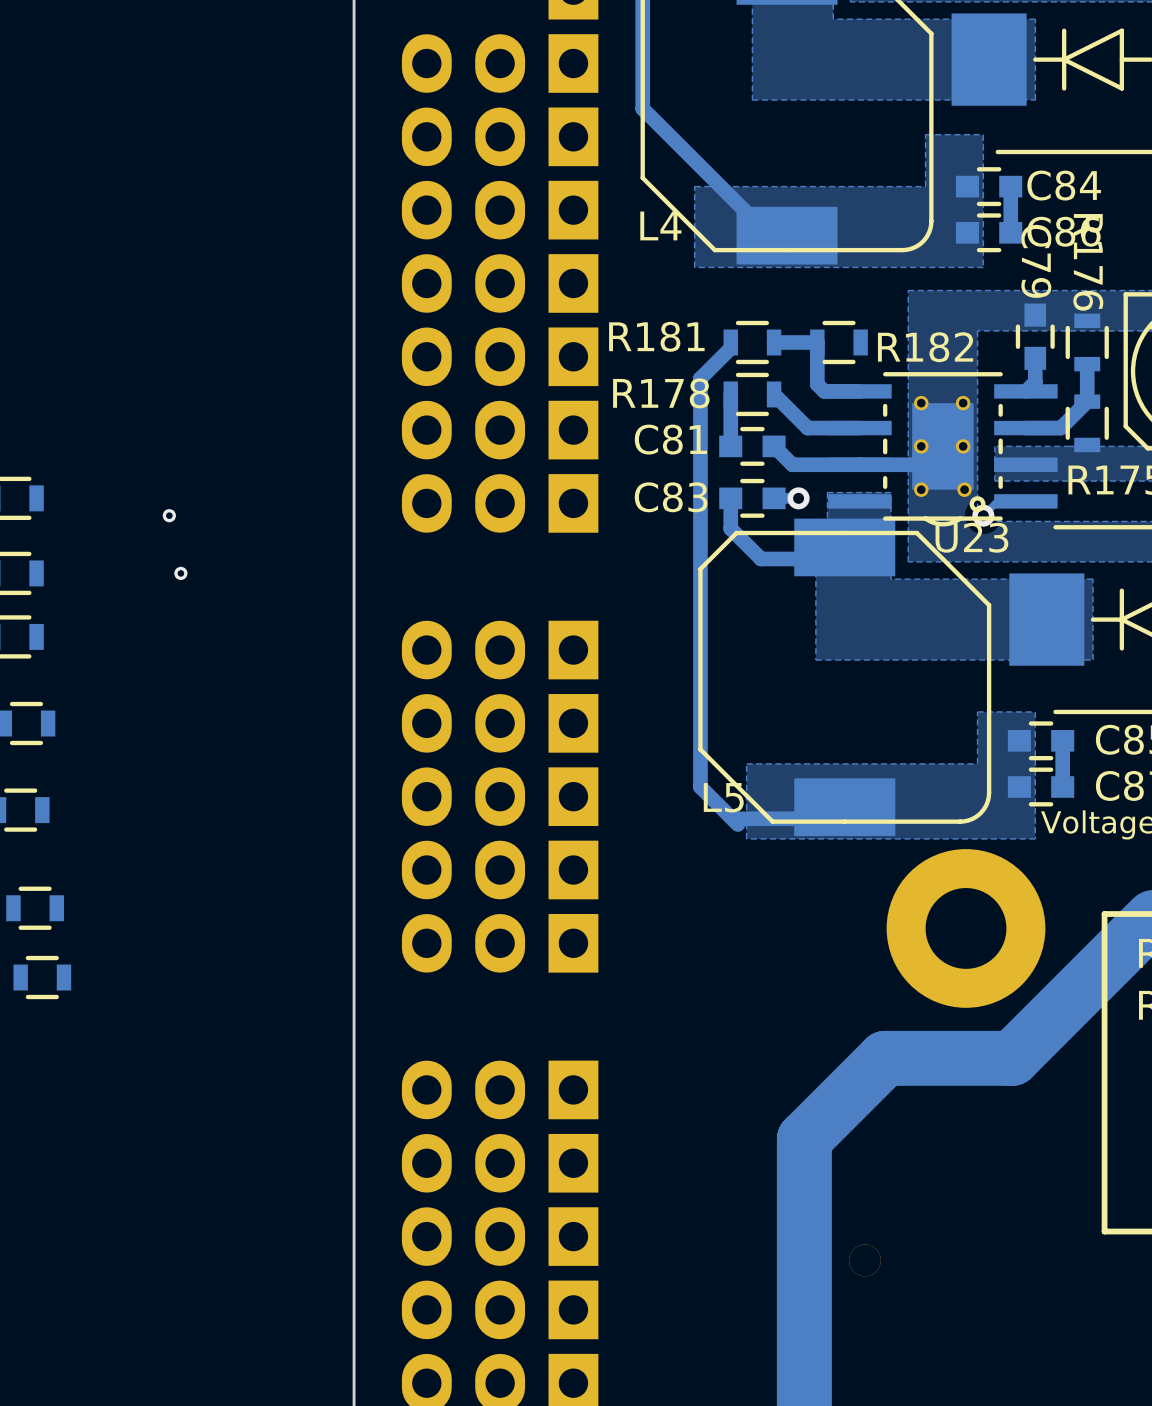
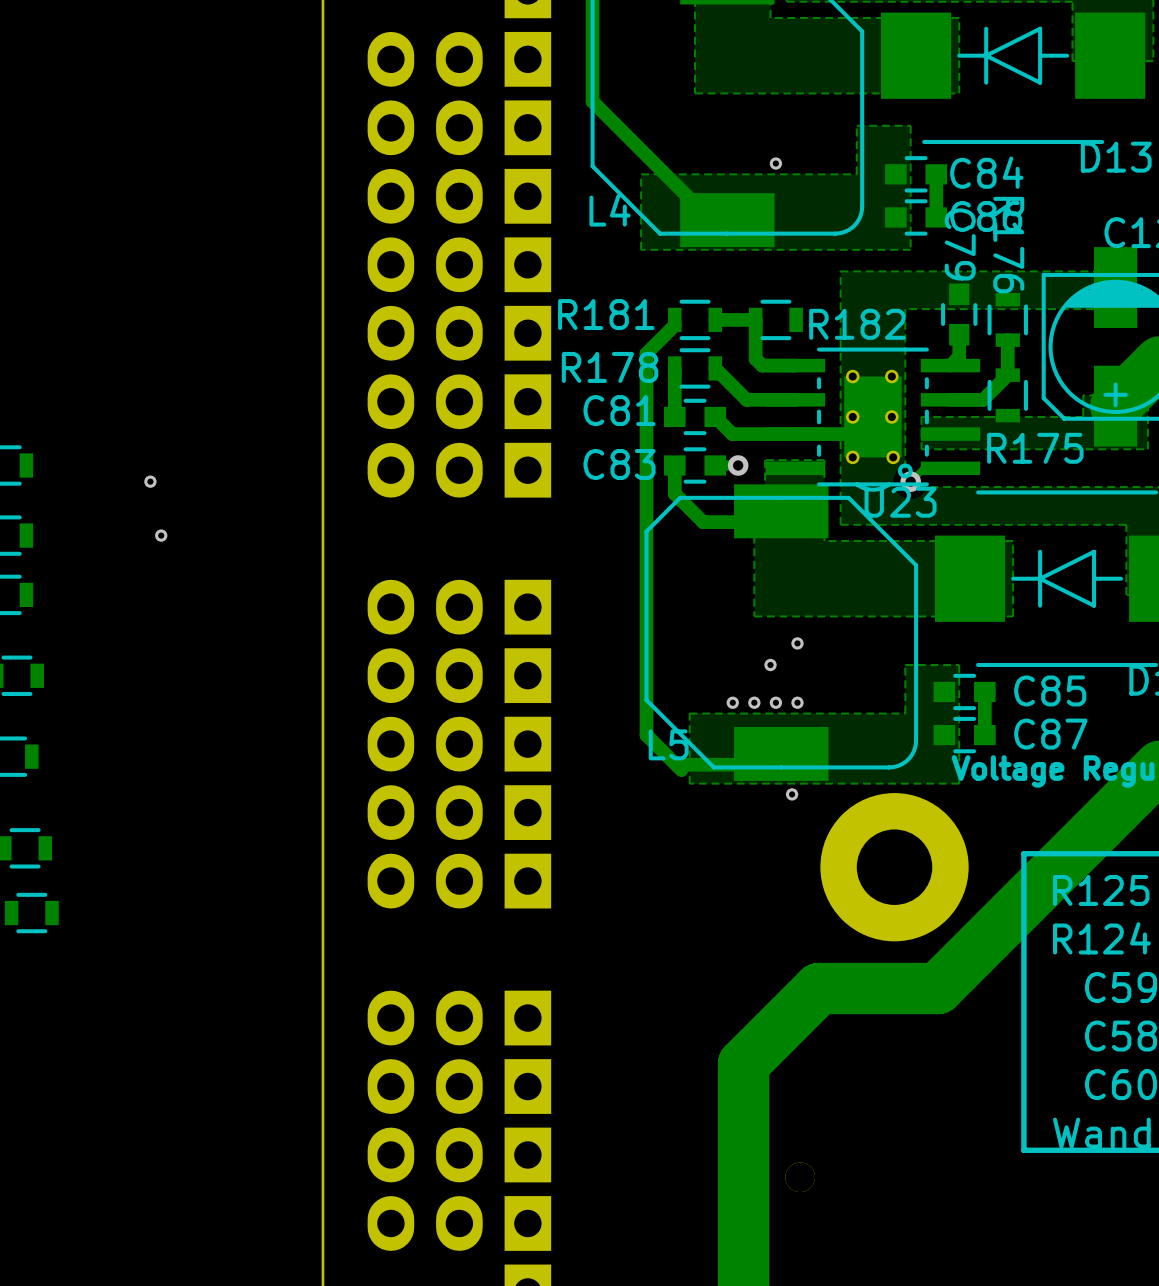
via: none -> (775, 163)
via: none -> (797, 643)
via: none -> (770, 665)
via: none -> (732, 702)
via: none -> (754, 702)
via: none -> (775, 702)
via: none -> (797, 702)
via: none -> (792, 794)

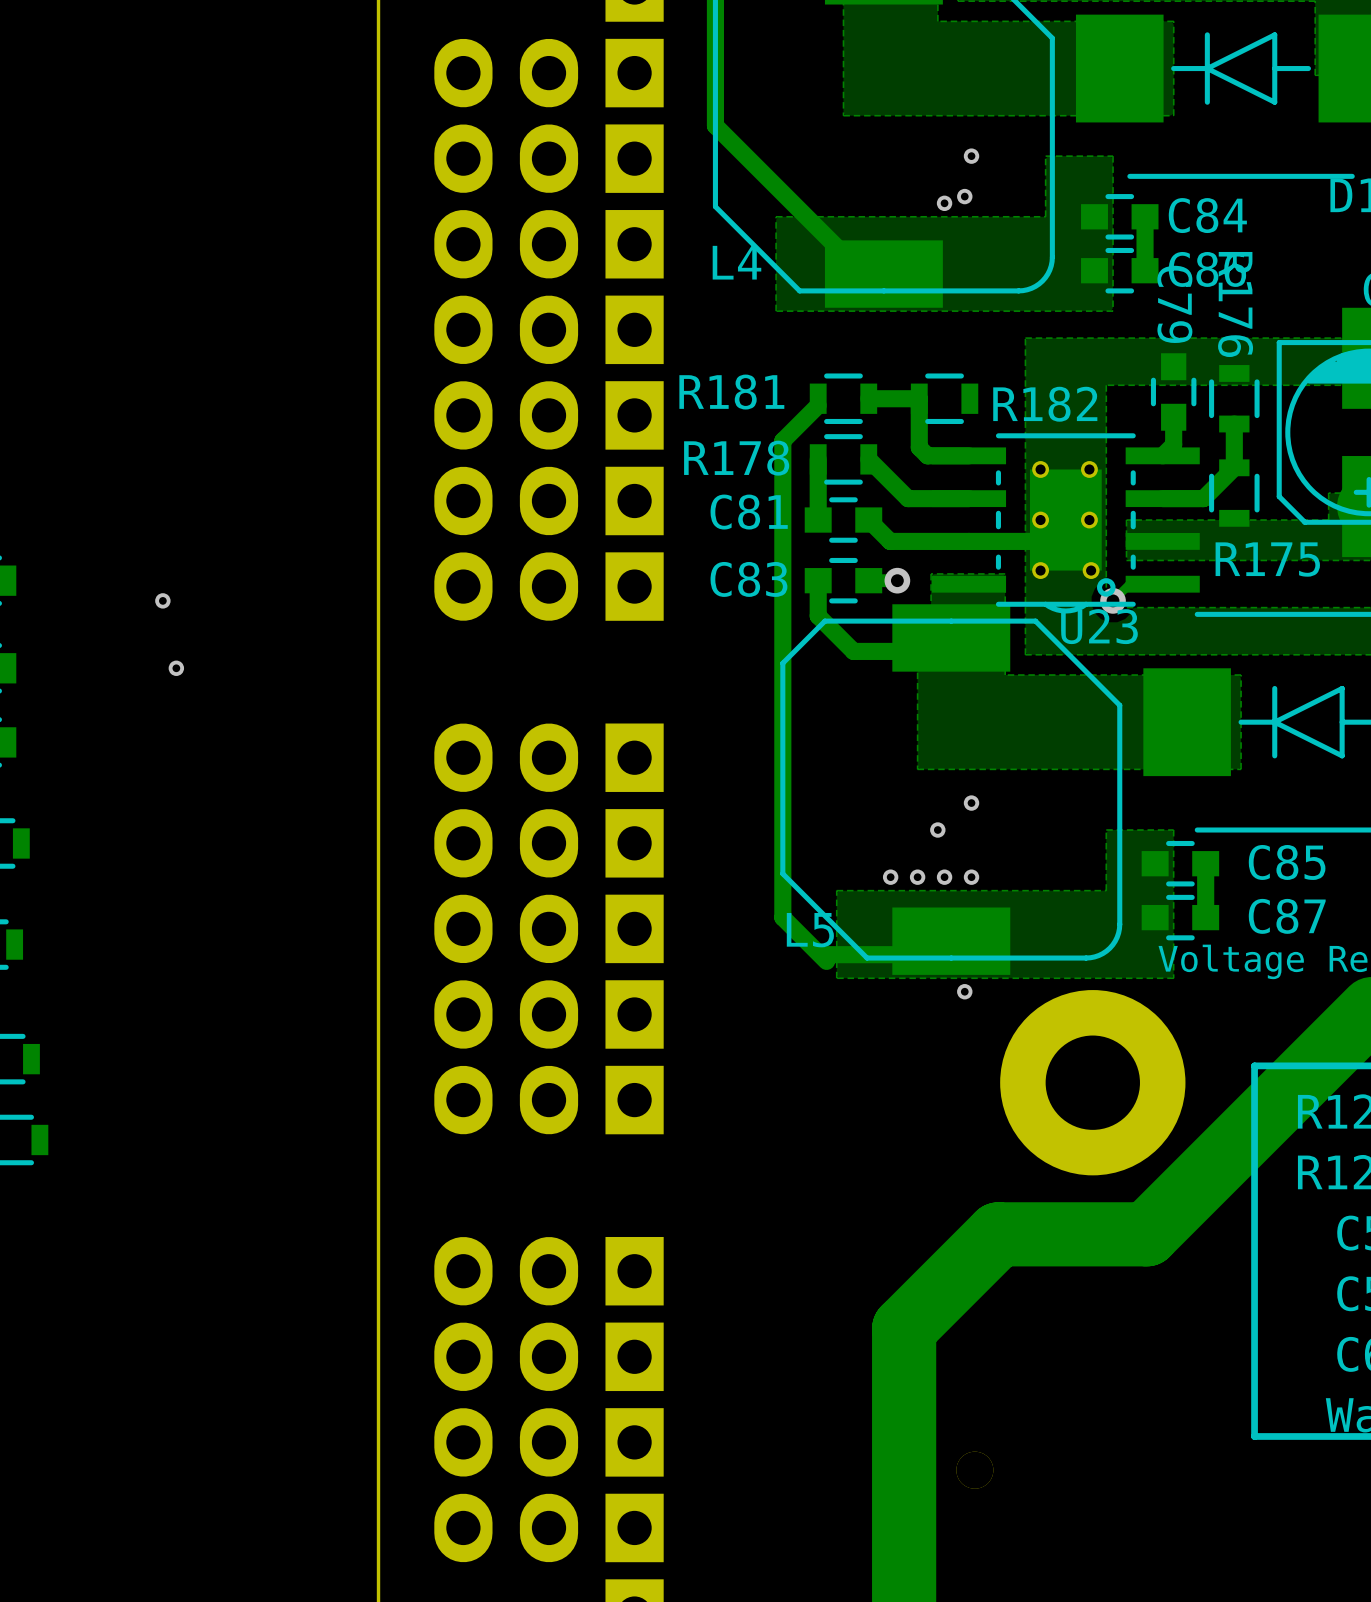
via: none -> (971, 156)
via: none -> (964, 196)

